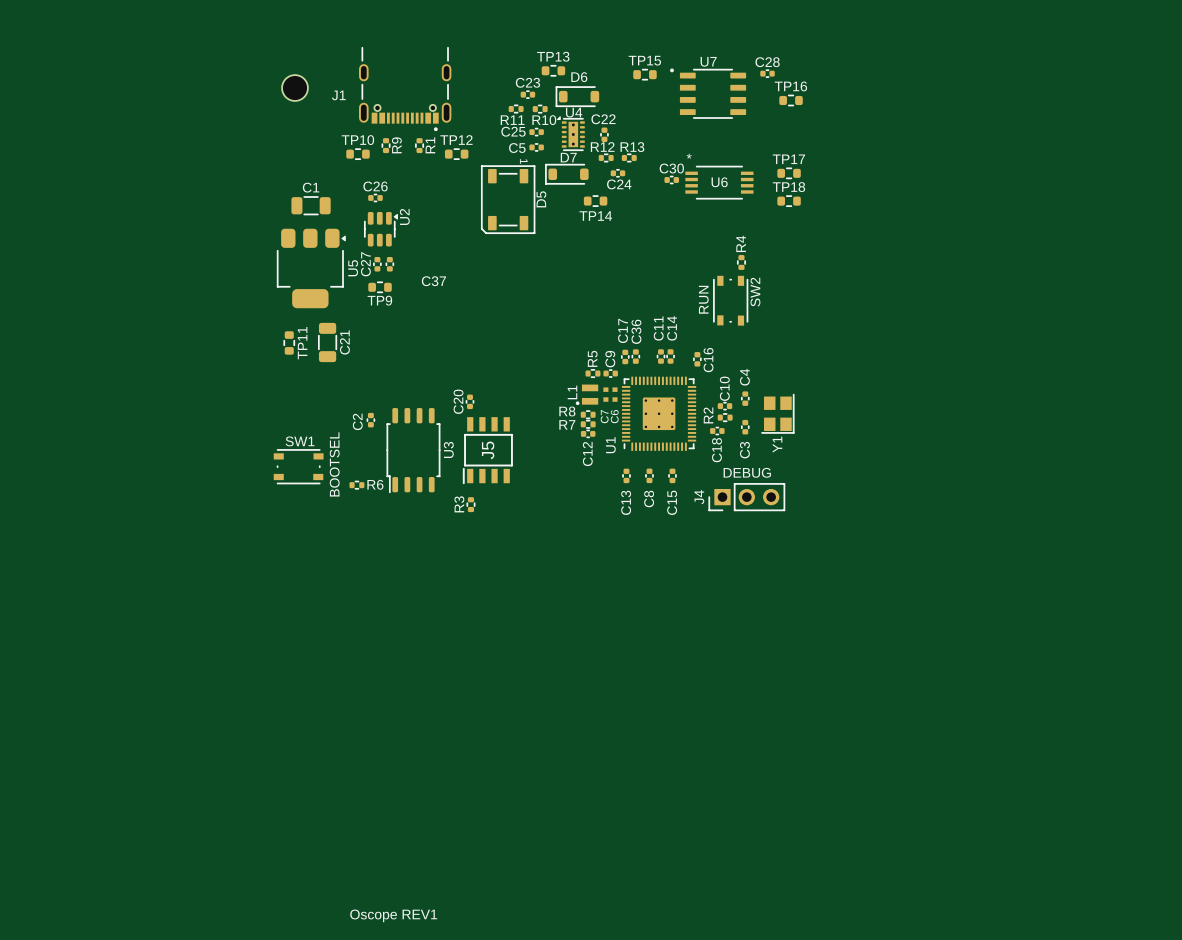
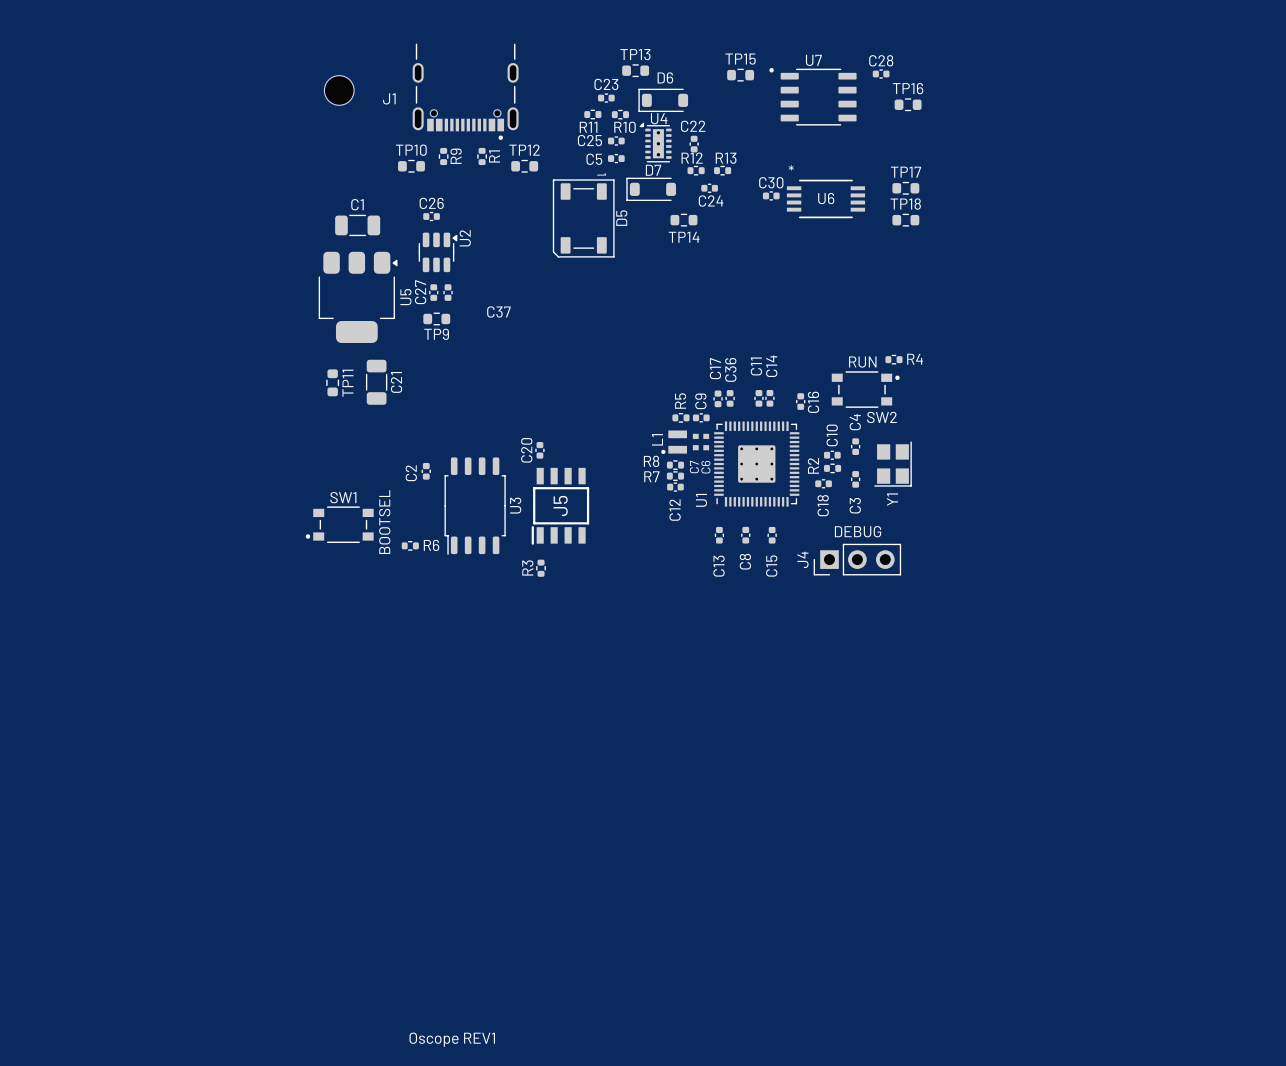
R4 rotation: 0° (741, 262) -> 90° clockwise (893, 359)
R4 position: (741, 262) -> (893, 359)
SW2 footprint: [713, 275, 749, 326] -> [831, 371, 900, 408]
SW2 name position: SW2 (755, 292) -> SW2 (881, 417)
text rotation: 0° (703, 299) -> 90° clockwise (862, 362)
text position: RUN (703, 299) -> RUN (862, 362)
SW1 footprint: [273, 449, 324, 485] -> [305, 506, 374, 543]

